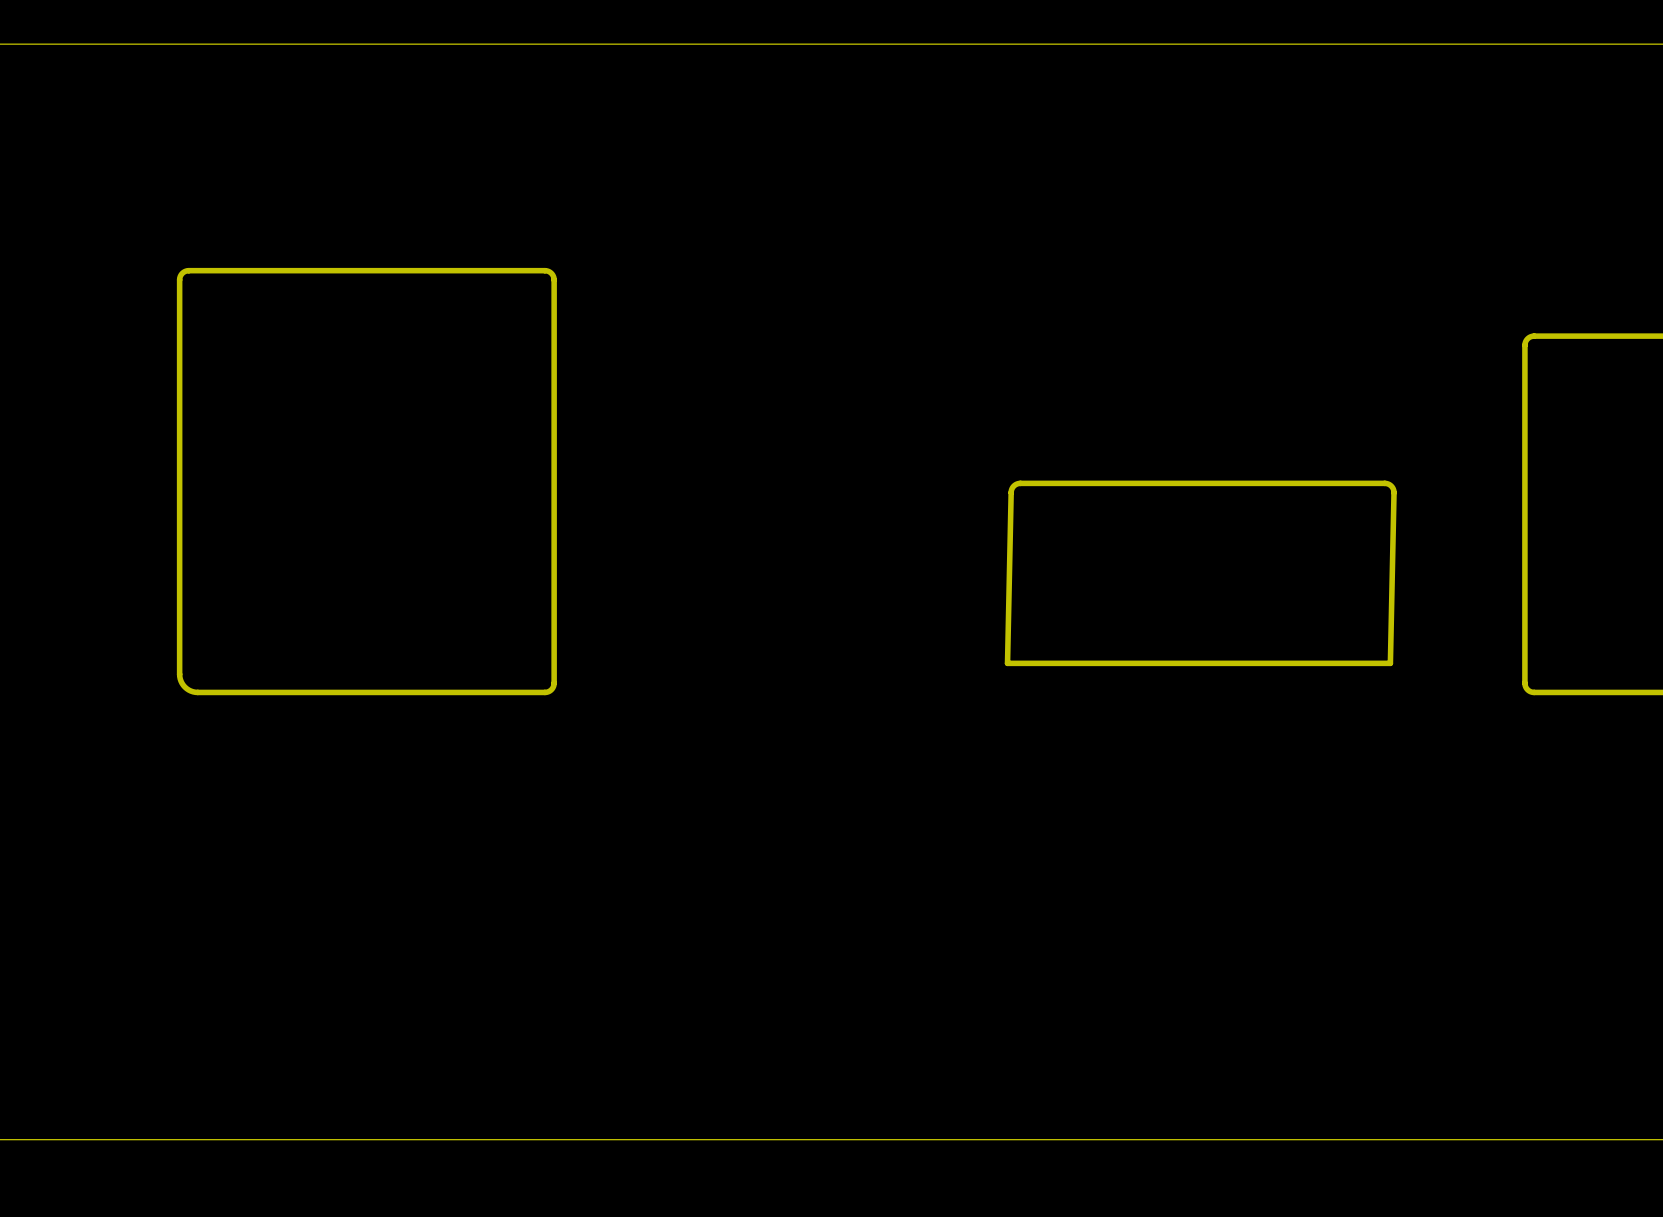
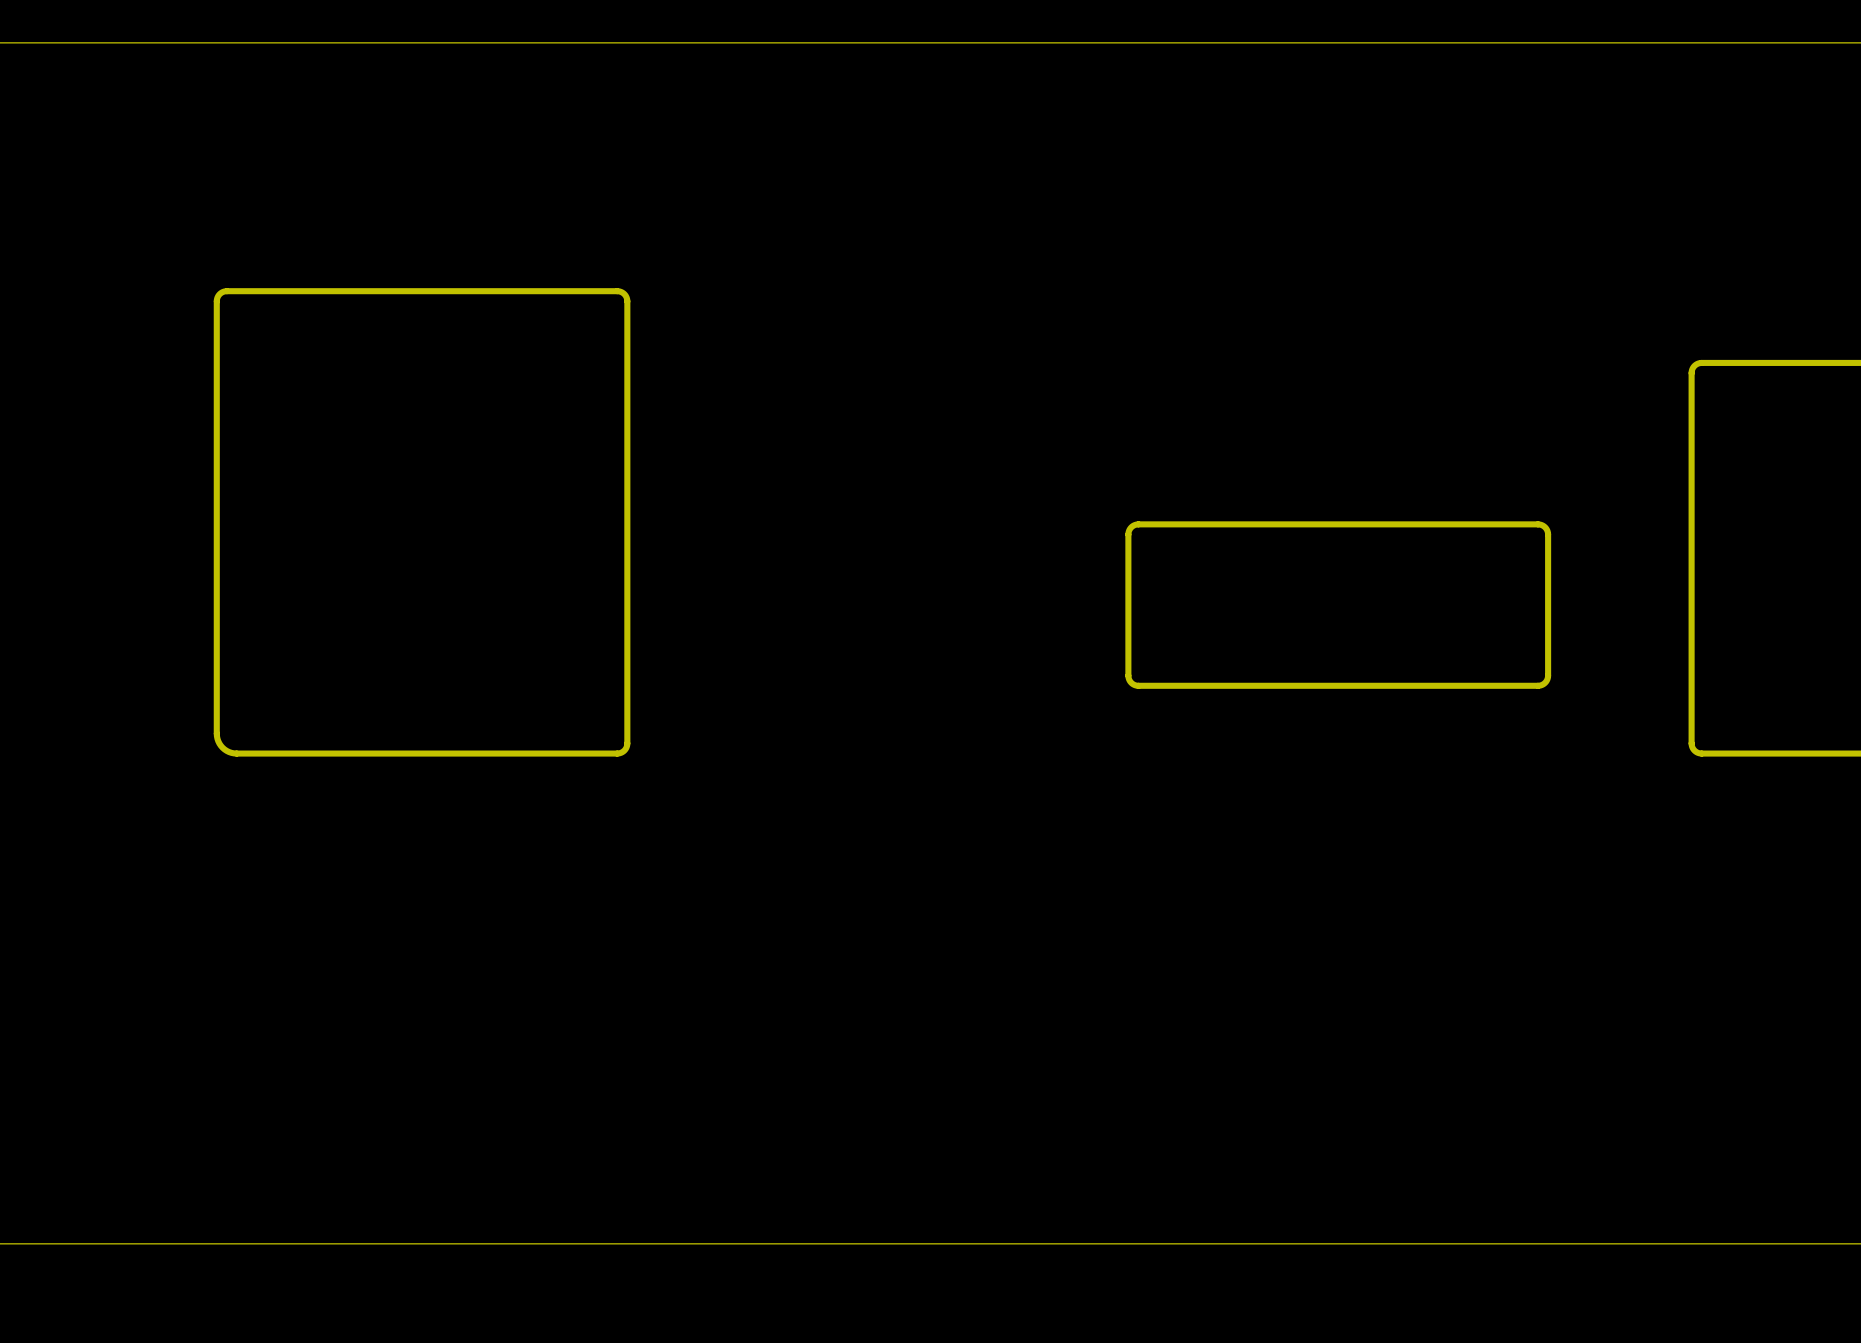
board edge: (1394, 492) (1390, 663) (1007, 663) (1011, 492) -> (1548, 534) (1548, 676) (1545, 682) (1537, 685) (1134, 685) (1129, 680) (1128, 675) (1128, 534)

